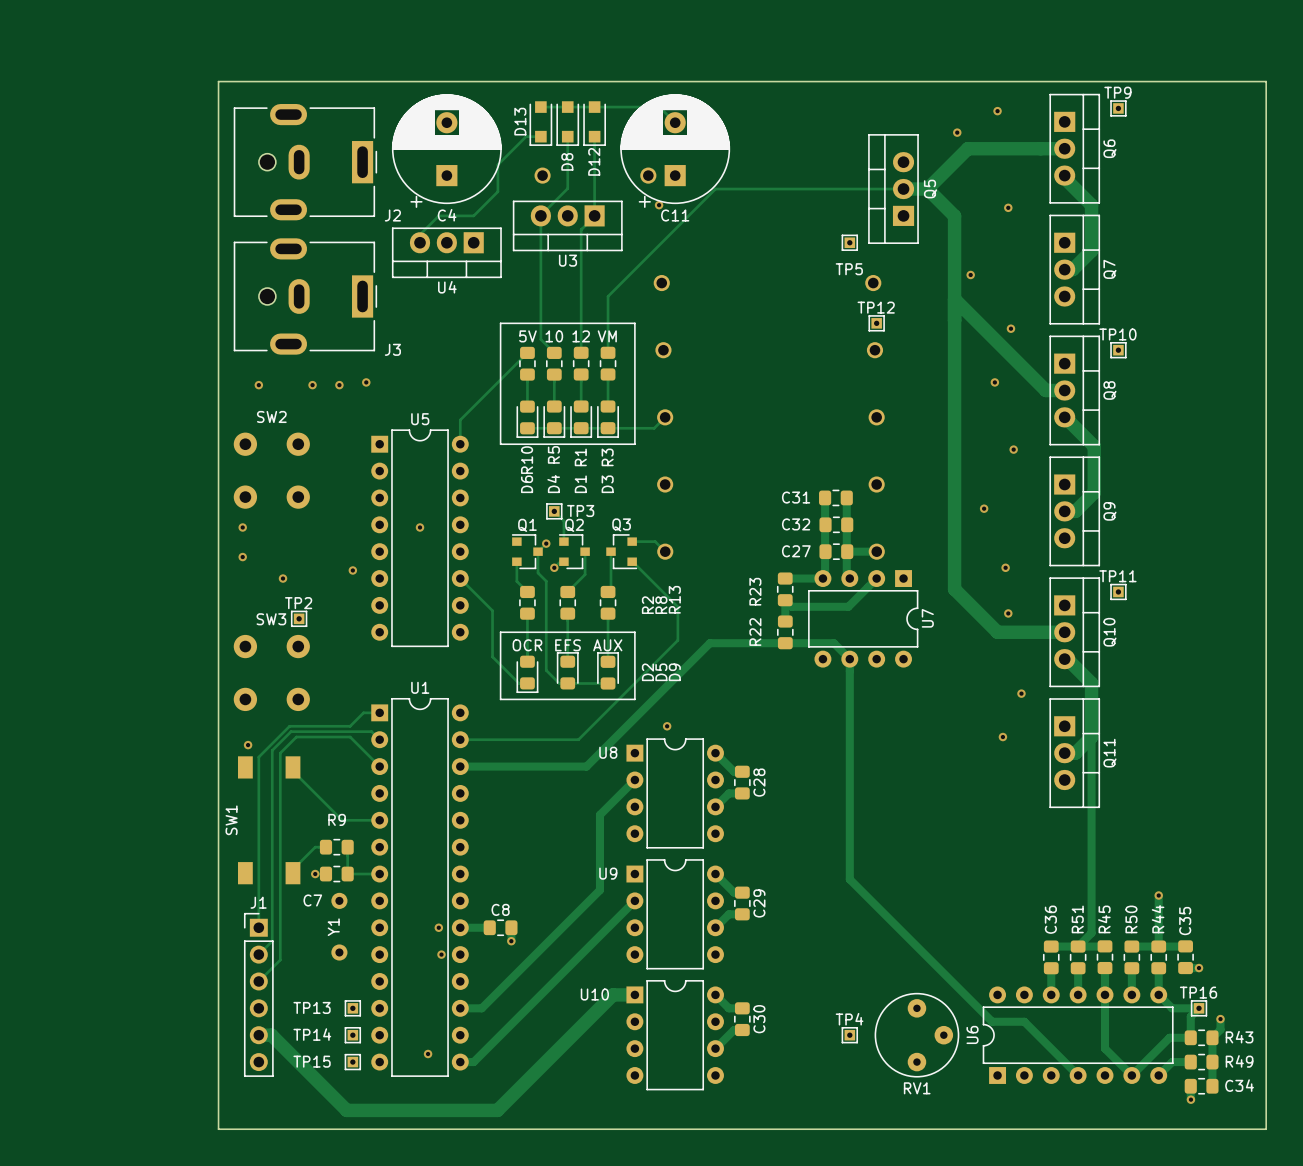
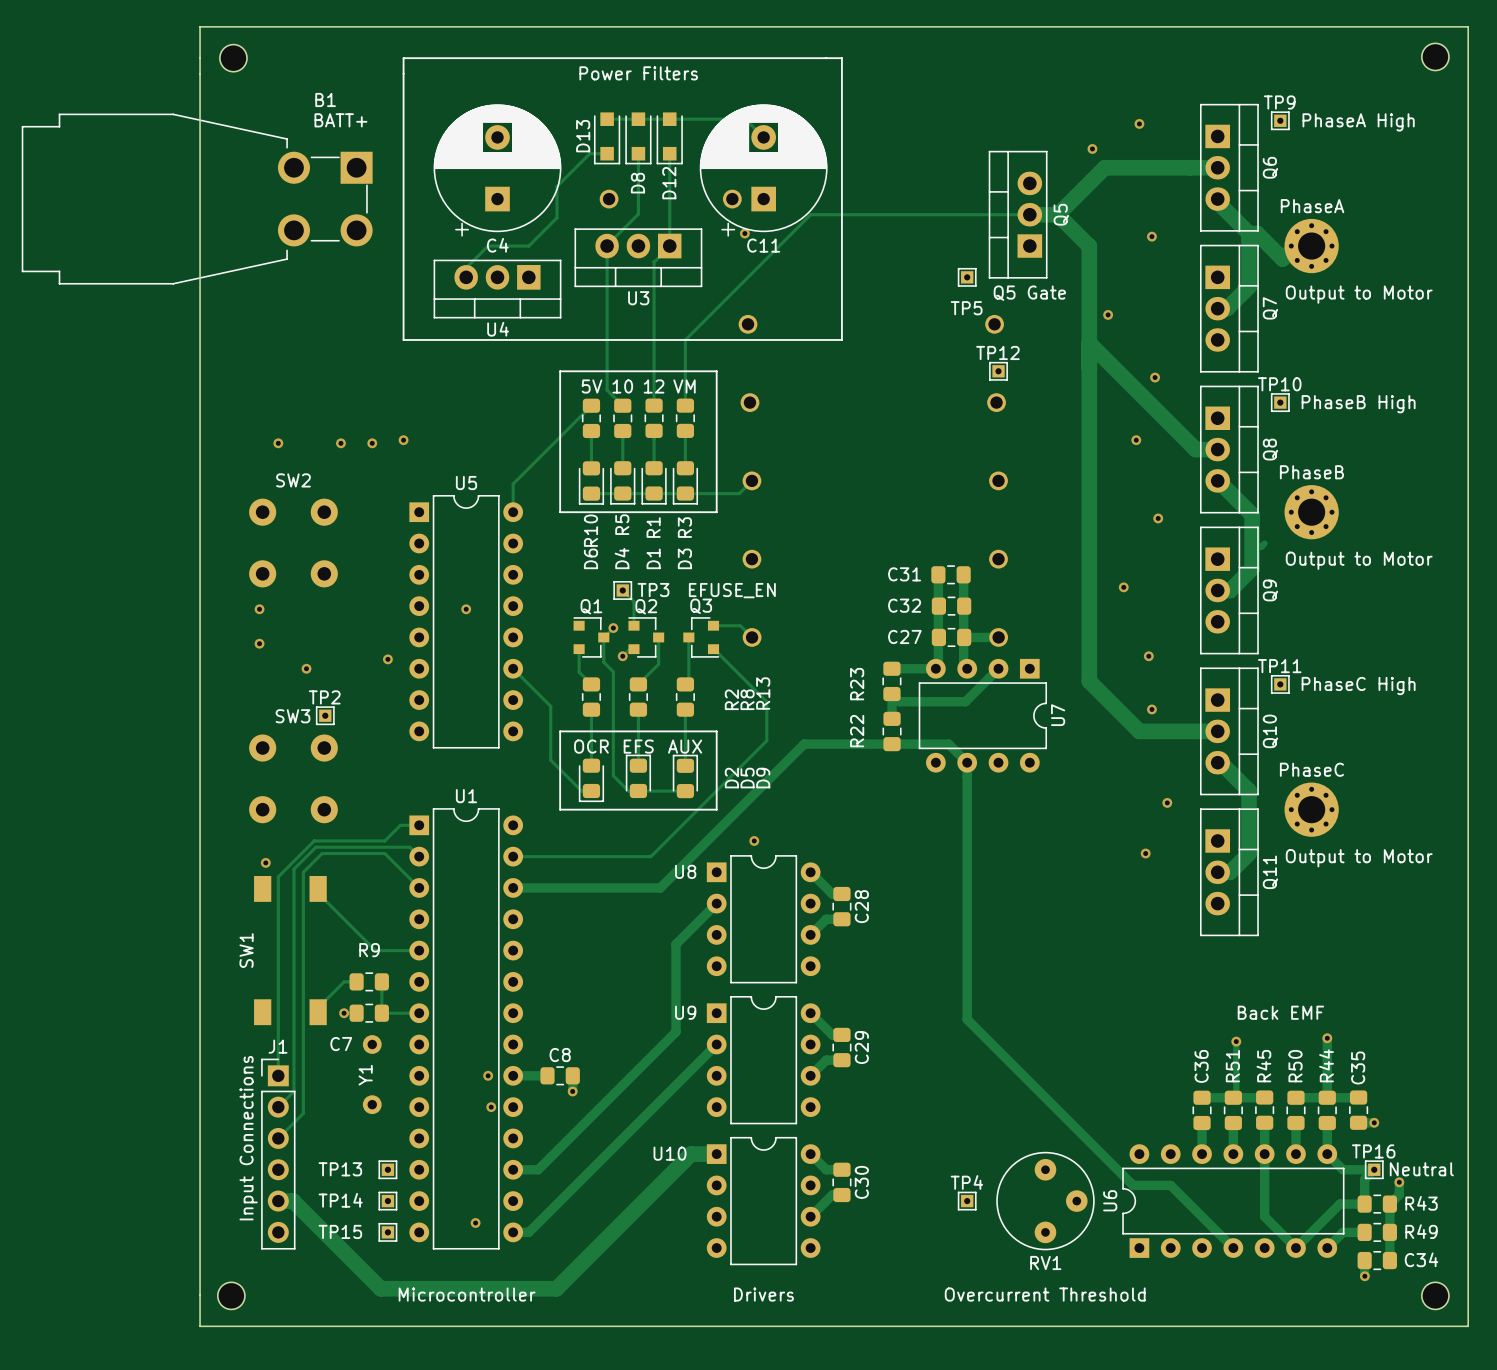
part: none -> (1435, 56)
part: none -> (233, 58)
line: none -> (403, 58) (841, 58) (841, 339) (403, 339) (403, 58)
text: none -> Power Filters (638, 73)
board edge: (218, 81) (218, 1129) (1266, 1129) (1266, 81) (218, 81) -> (200, 26) (200, 1326) (1468, 1326) (1468, 26) (200, 26)
text: none -> BATT+ (340, 120)
text: none -> PhaseA High (1358, 122)
J2: (305, 162) -> none
B1: none -> (197, 199)
track: none -> (1249, 233) (1257, 233) (1282, 259) (1311, 233)
PhaseA: none -> (1311, 246)
text: none -> Q5 Gate (1029, 293)
text: none -> Output to Motor (1359, 294)
J3: (305, 296) -> none
text: none -> PhaseB High (1358, 404)
PhaseB: none -> (1311, 512)
track: none -> (1264, 543) (1261, 546) (1252, 546)
text: none -> Output to Motor (1359, 560)
text: none -> EFUSE_EN (732, 590)
text: none -> PhaseC High (1358, 686)
PhaseC: none -> (1311, 809)
track: (1091, 737) (1091, 933) (1080, 944) -> (1236, 1041) (1236, 1094)
text: none -> Output to Motor (1359, 858)
text: none -> Back EMF (1280, 1012)
via: none -> (1236, 1041)
text: none -> Input Connections (248, 1138)
text: none -> Neutral (1421, 1169)
text: none -> Microcontroller (467, 1294)
text: none -> Drivers (763, 1294)
text: none -> Overcurrent Threshold (1045, 1294)
part: none -> (231, 1295)
part: none -> (1435, 1295)

